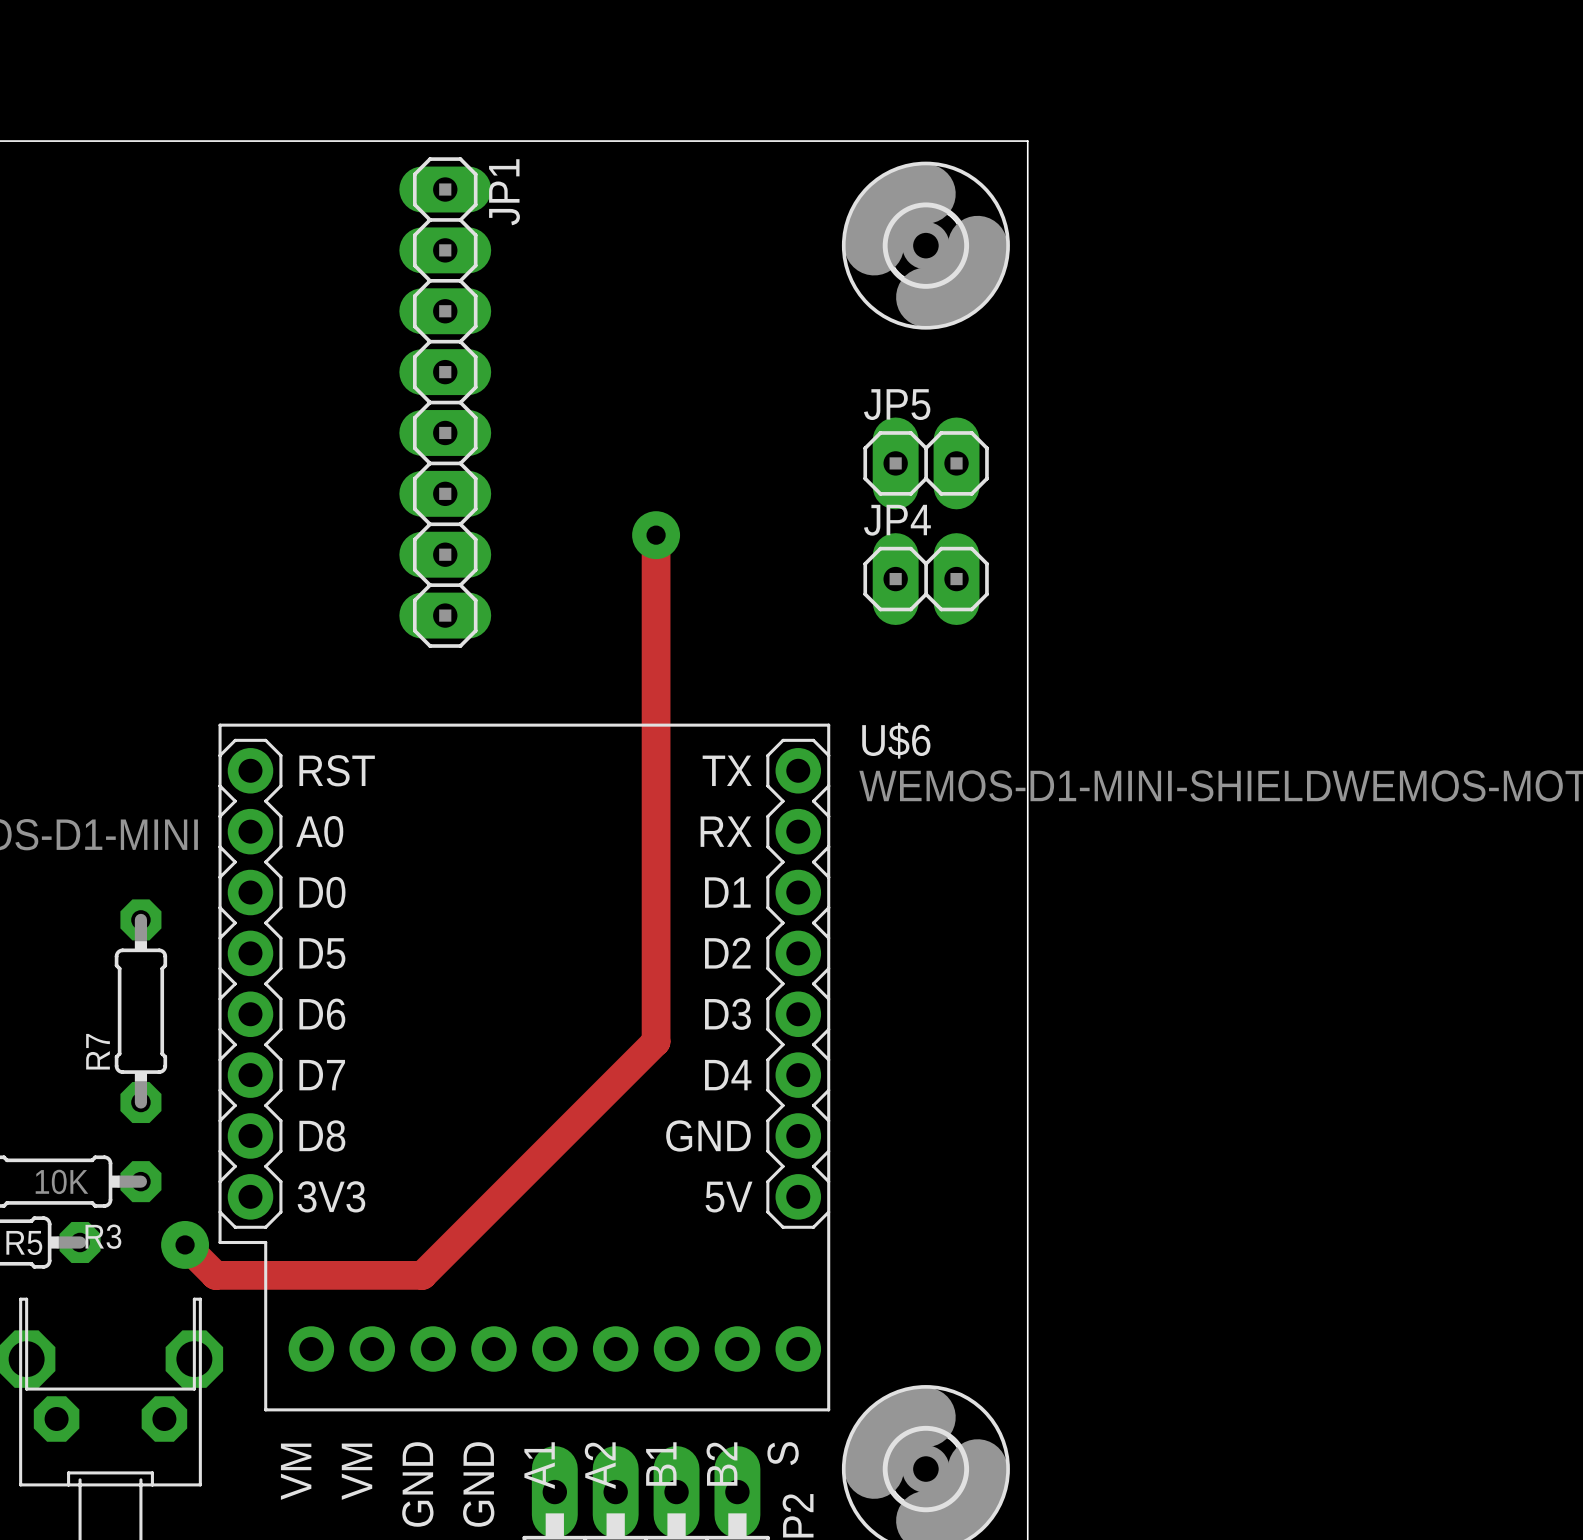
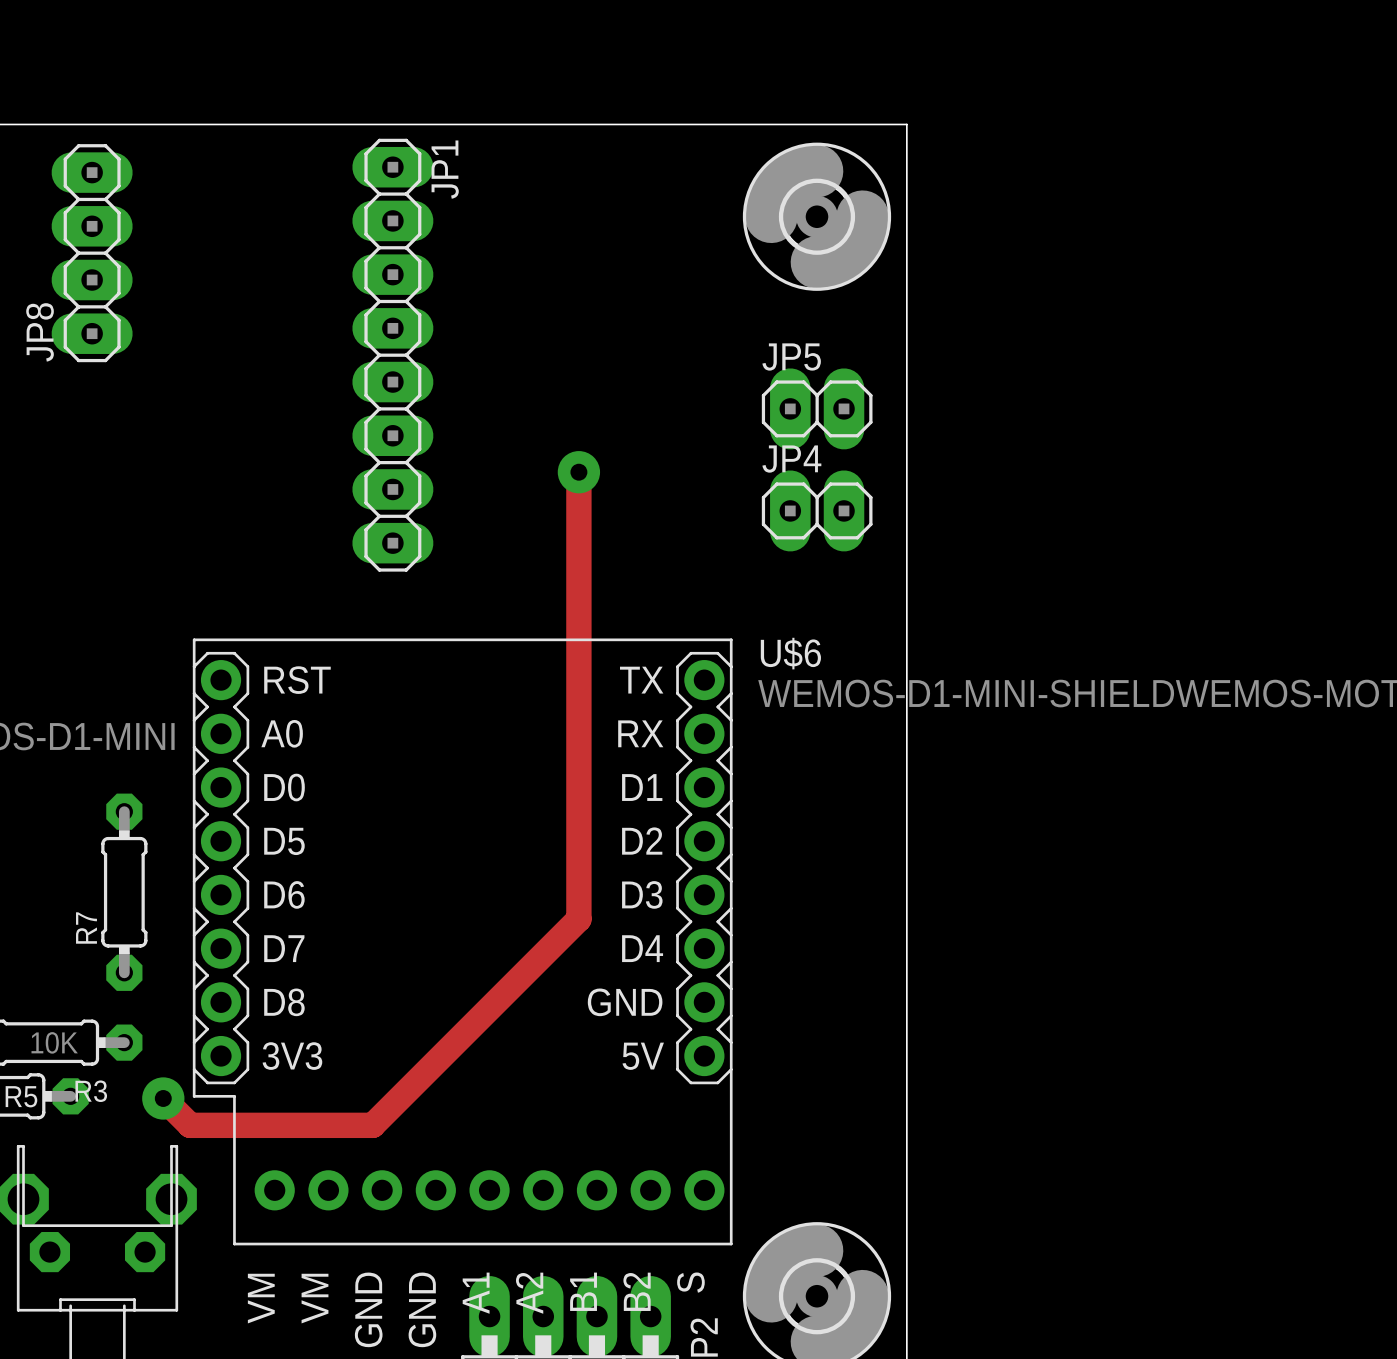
JP8: none -> (92, 253)

